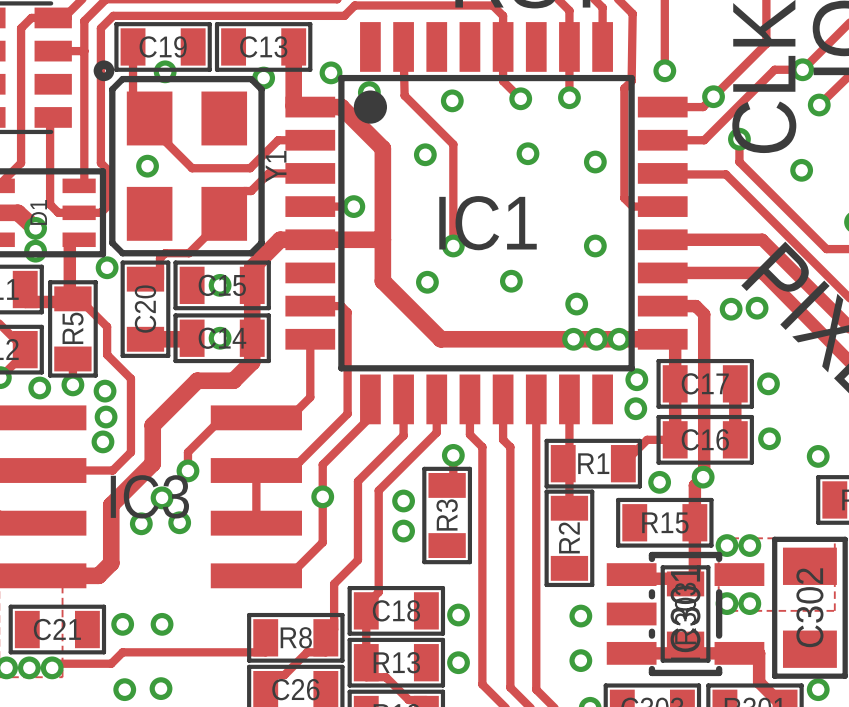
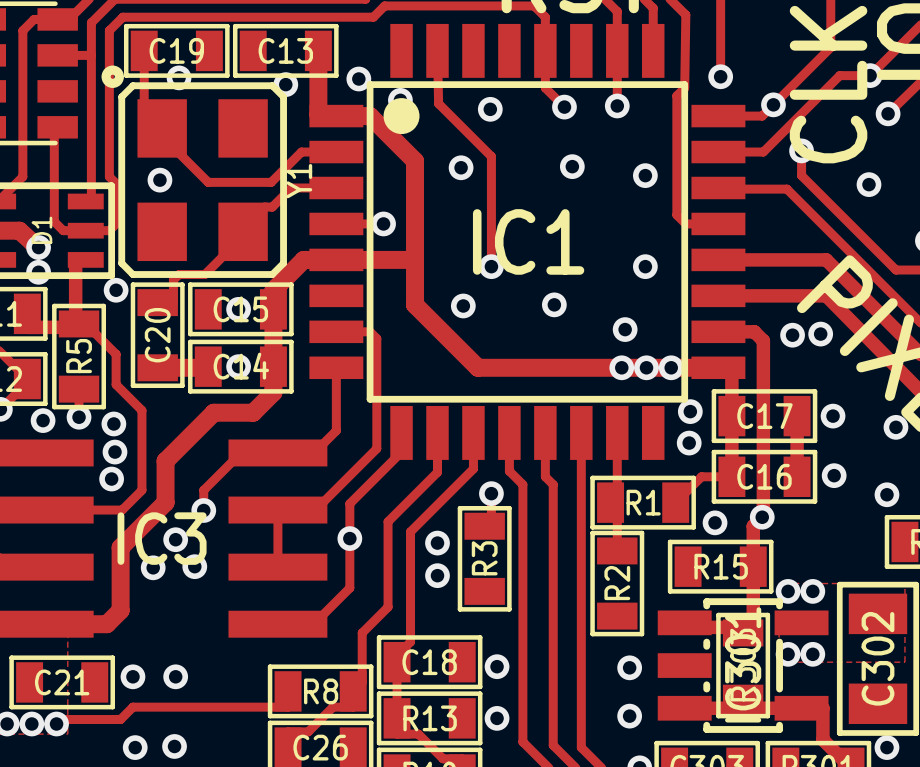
via: none -> (895, 427)

